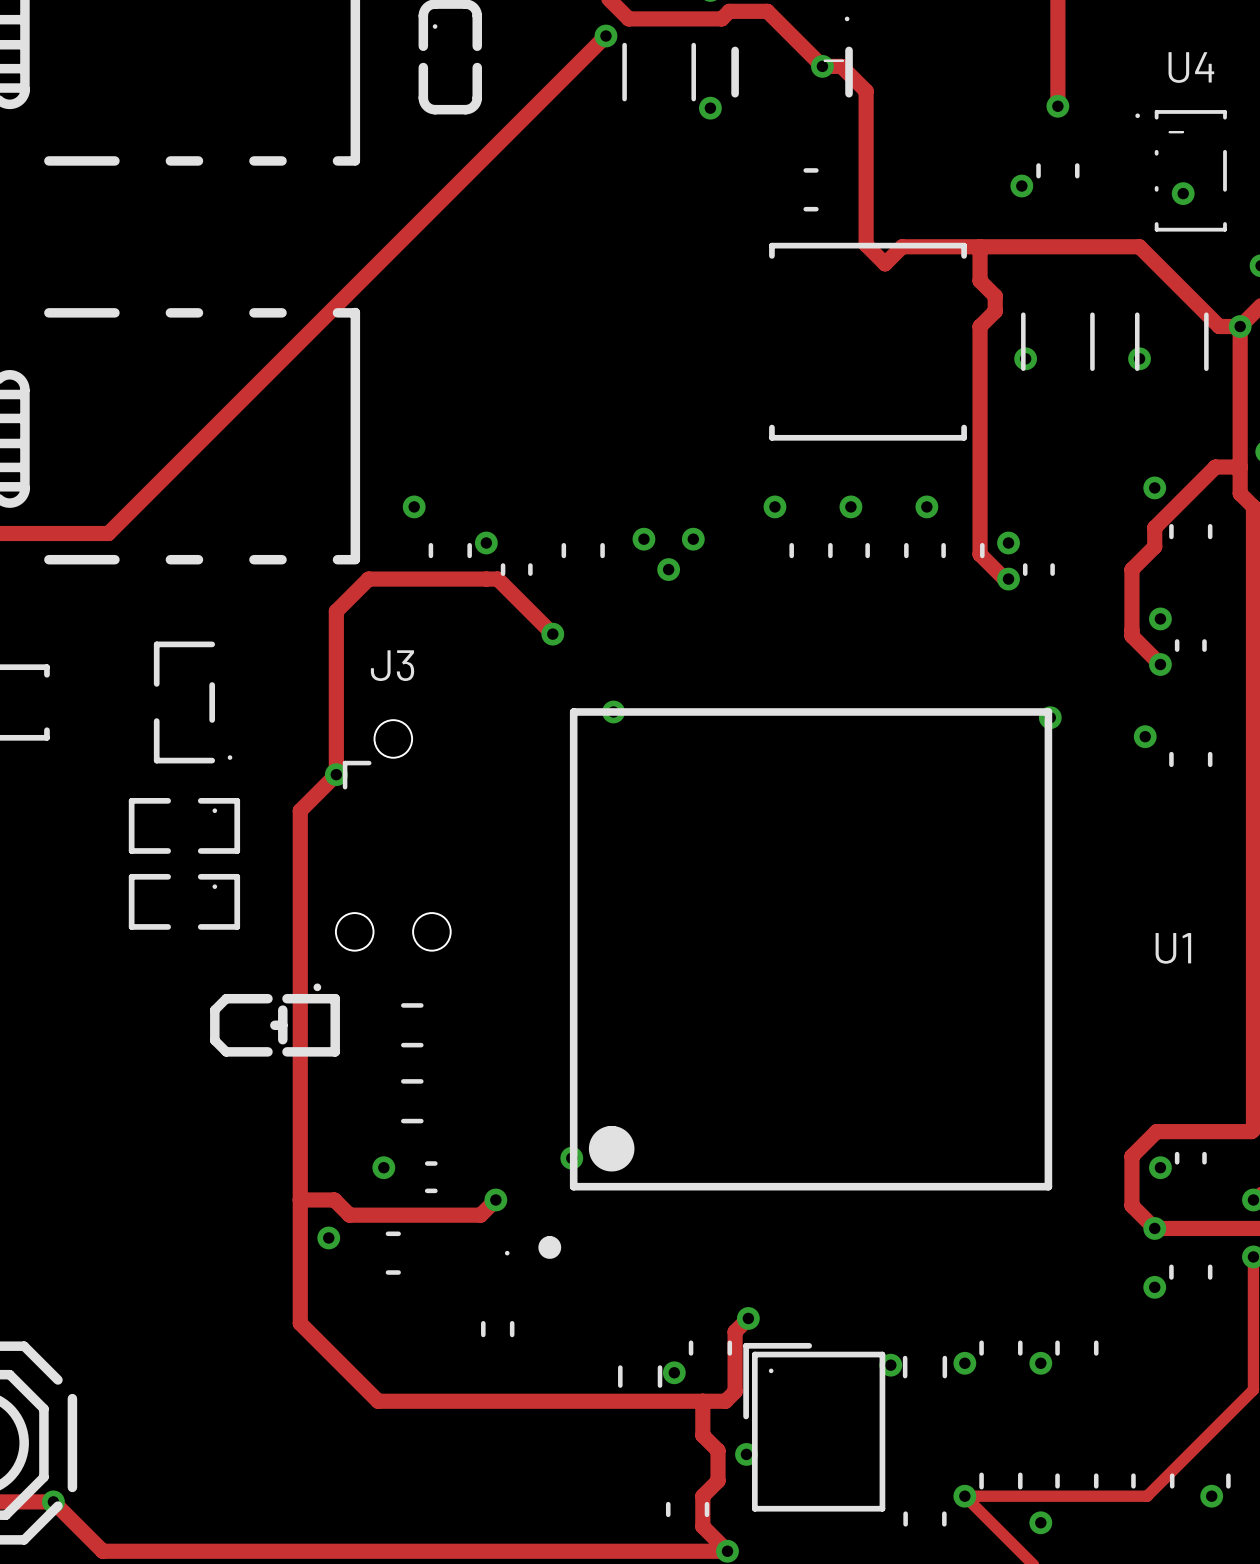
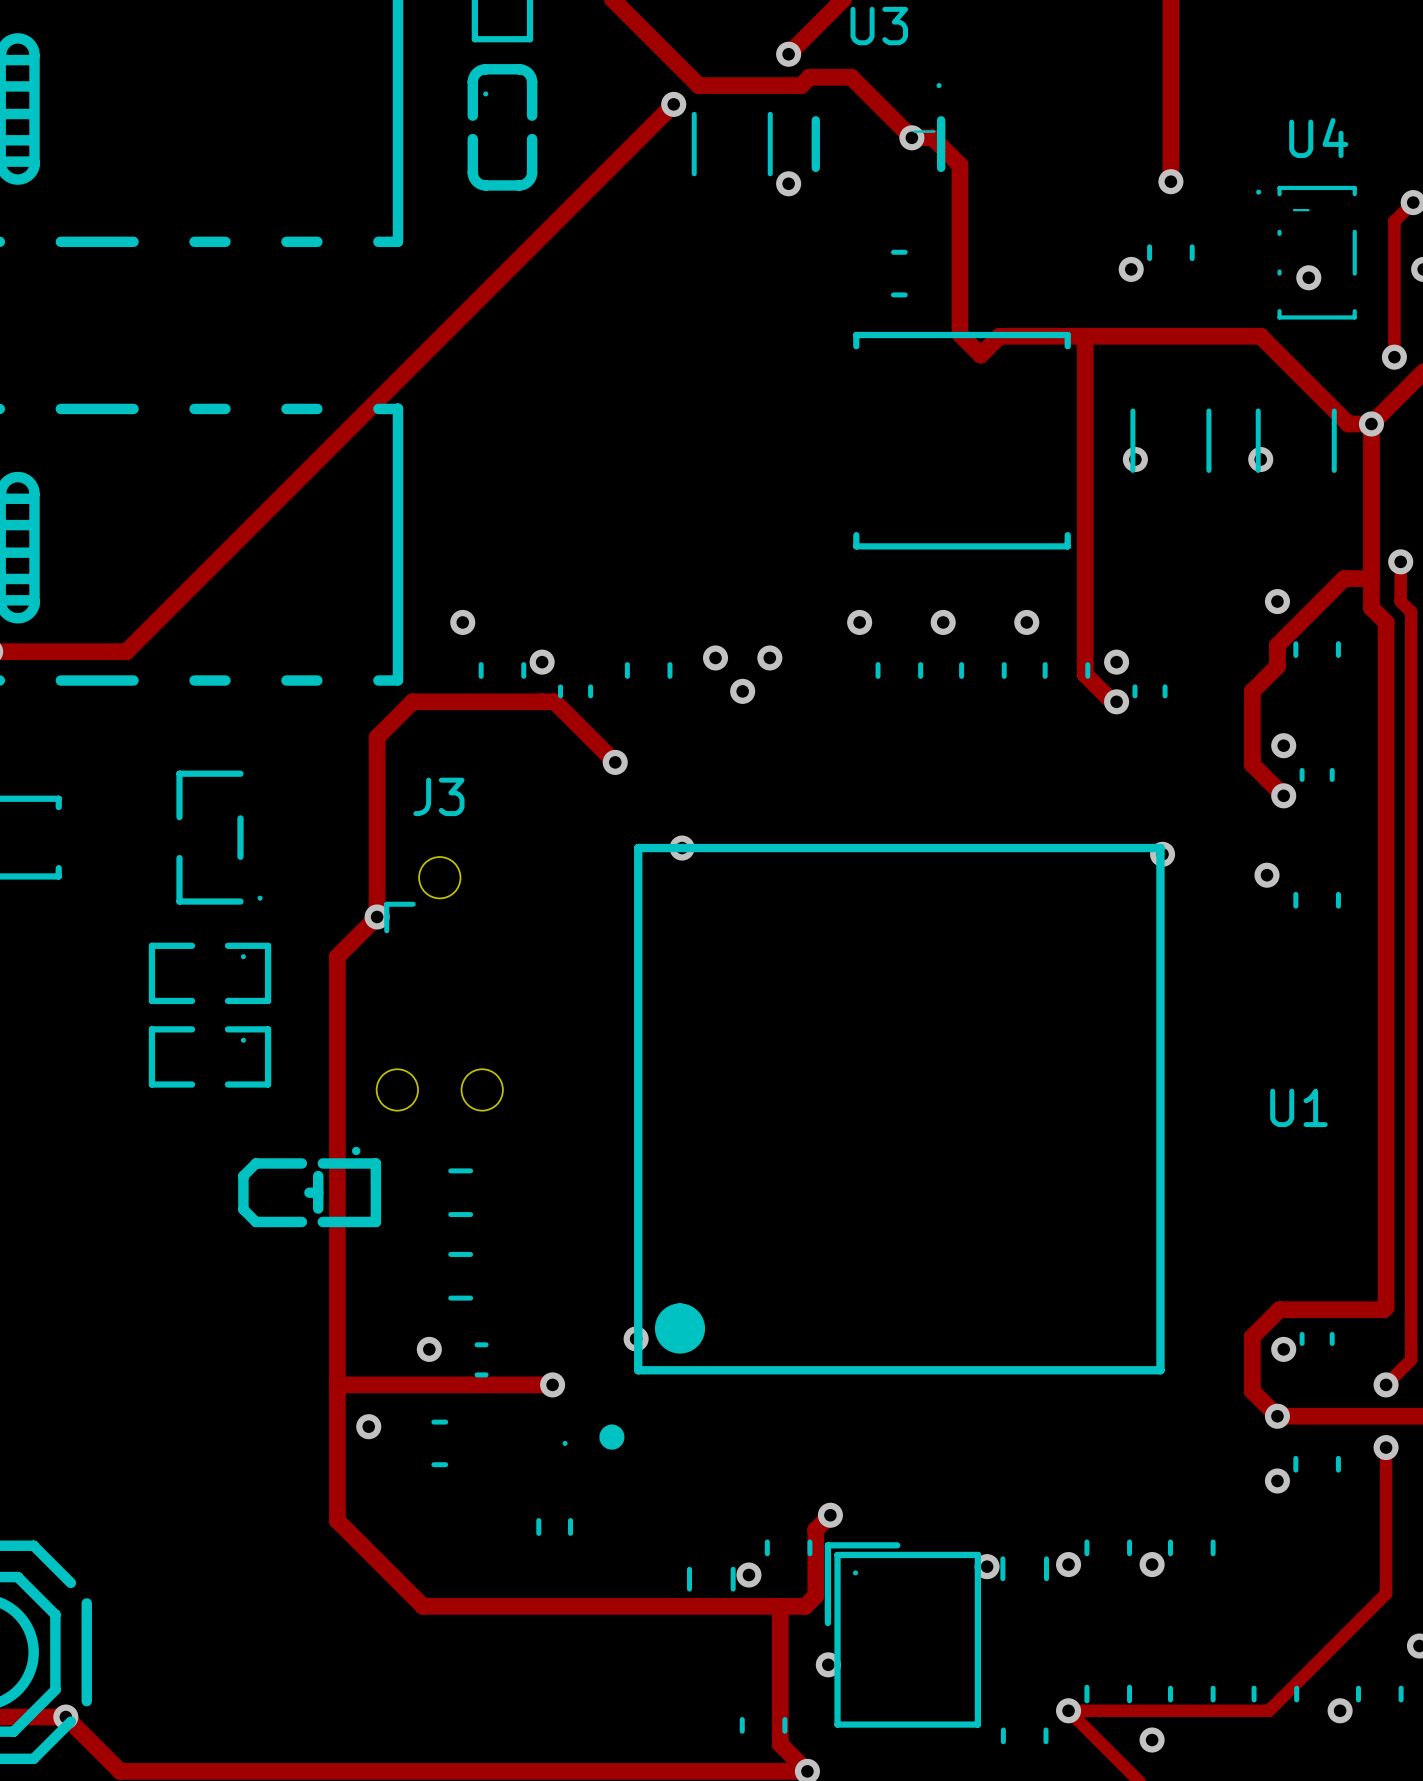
track: (980, 280) (995, 296) (995, 311) (980, 326) -> (1085, 373) (1085, 423)
track: (334, 1199) (349, 1215) (480, 1215) (495, 1199) -> (375, 1384) (552, 1384)
track: (702, 1435) (718, 1450) (718, 1481) (702, 1496) -> (780, 1643) (780, 1710)

